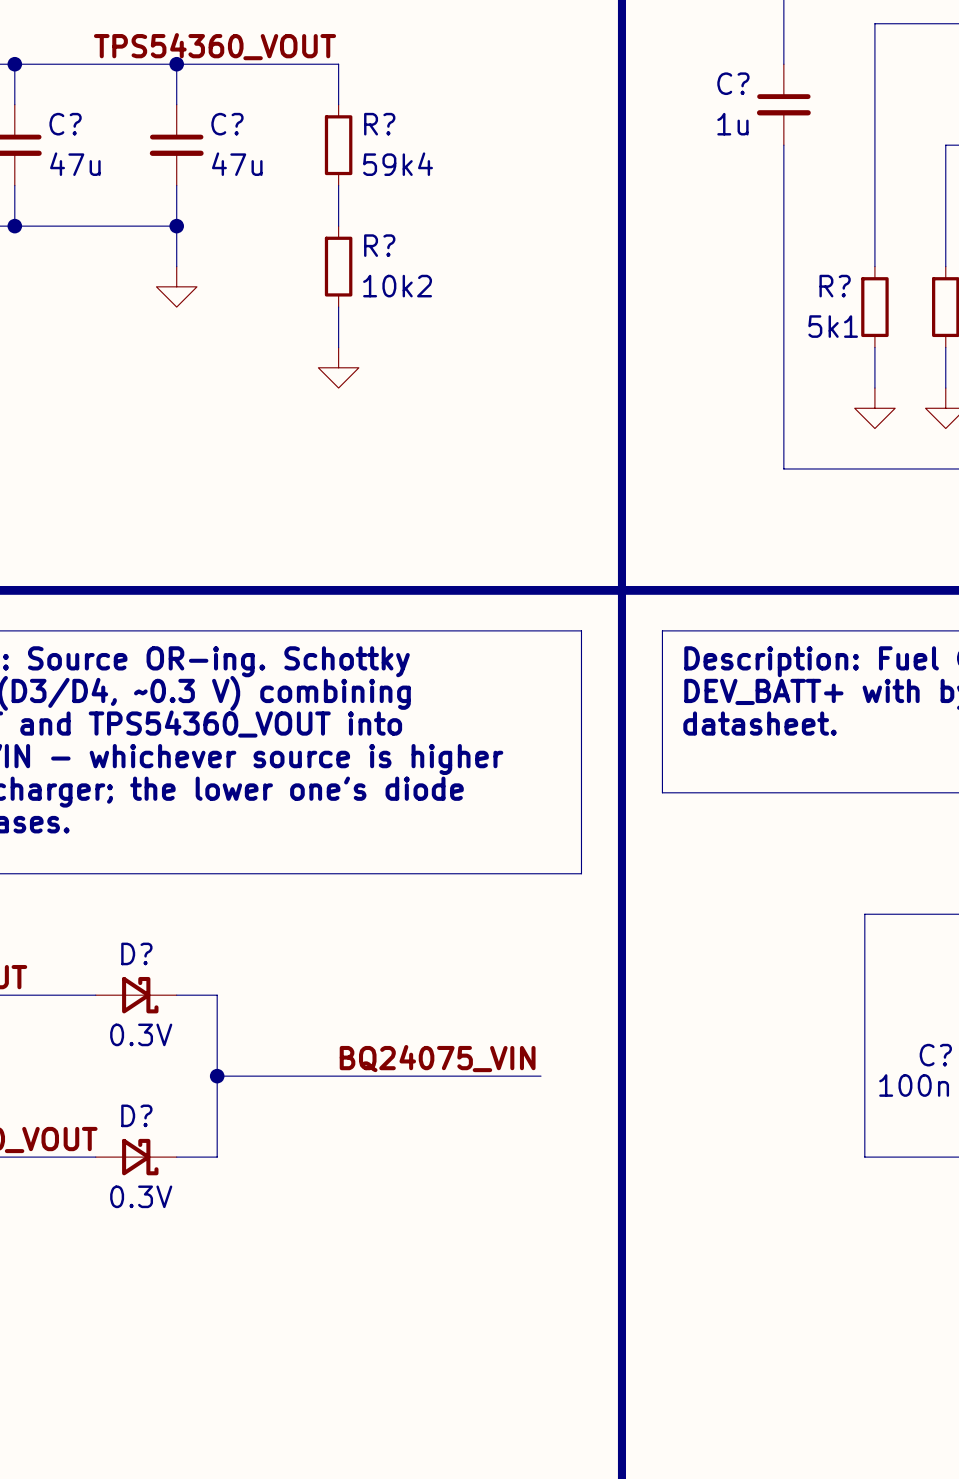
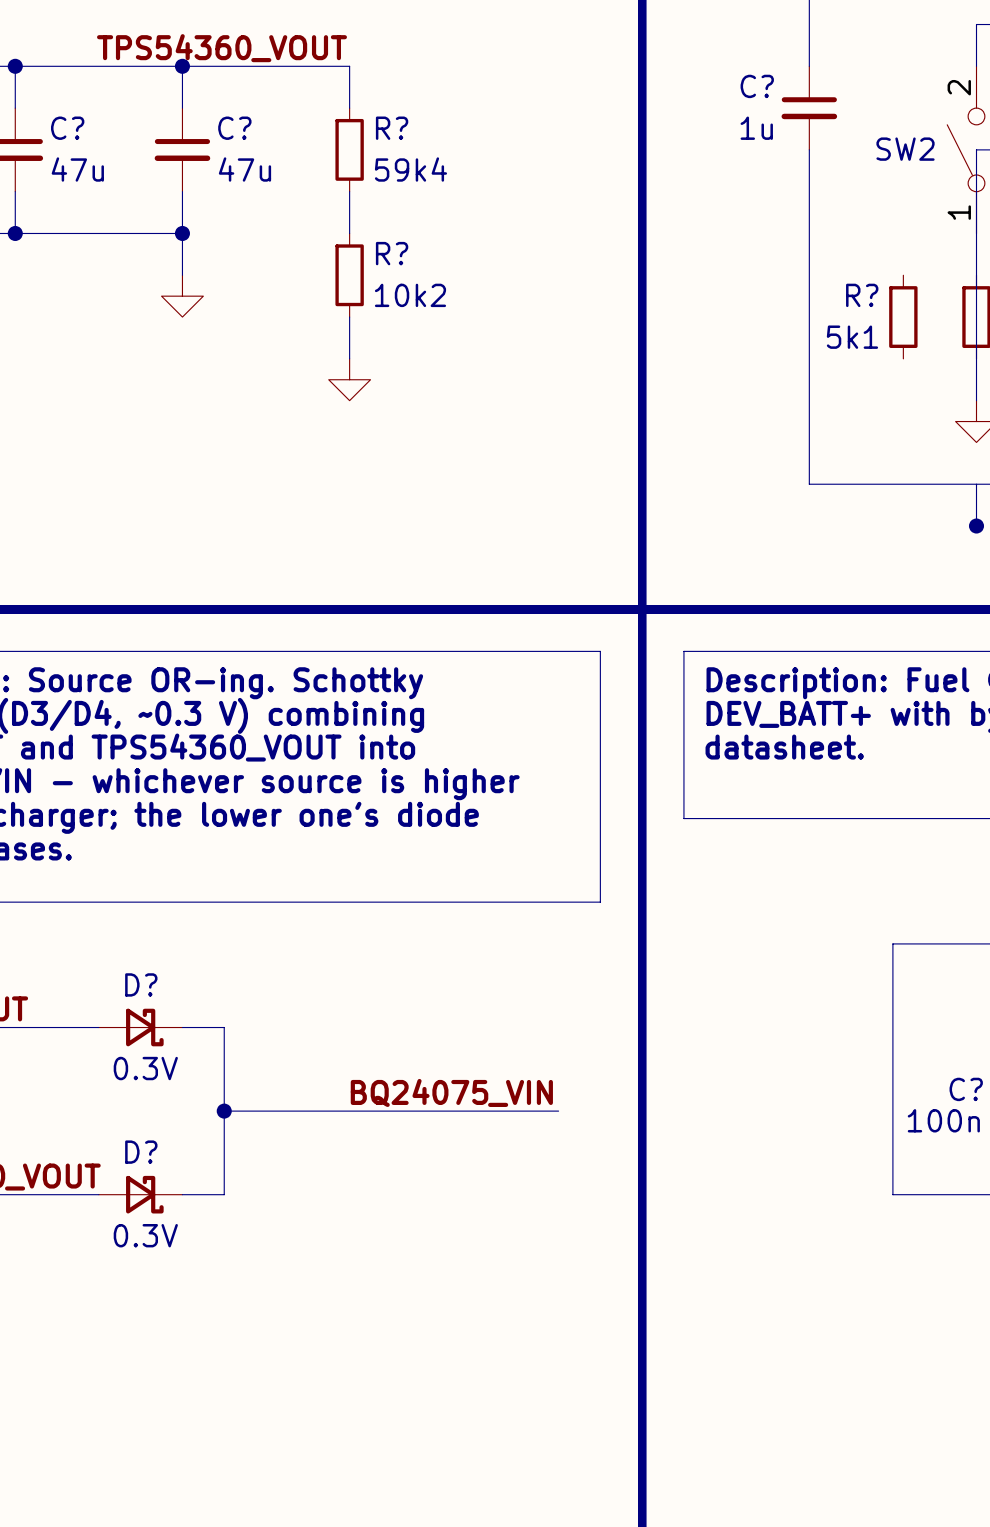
wire: (945, 23) (874, 23) (874, 266) -> (976, 24) (976, 66)
SW2: none -> (966, 149)
wire: none -> (976, 275) (976, 358)
R? value position: 5k1 (833, 326) -> 5k1 (852, 337)
wire: (874, 347) (874, 388) -> (976, 484) (976, 526)
power symbol: (874, 408) -> none
junction: none -> (976, 526)

